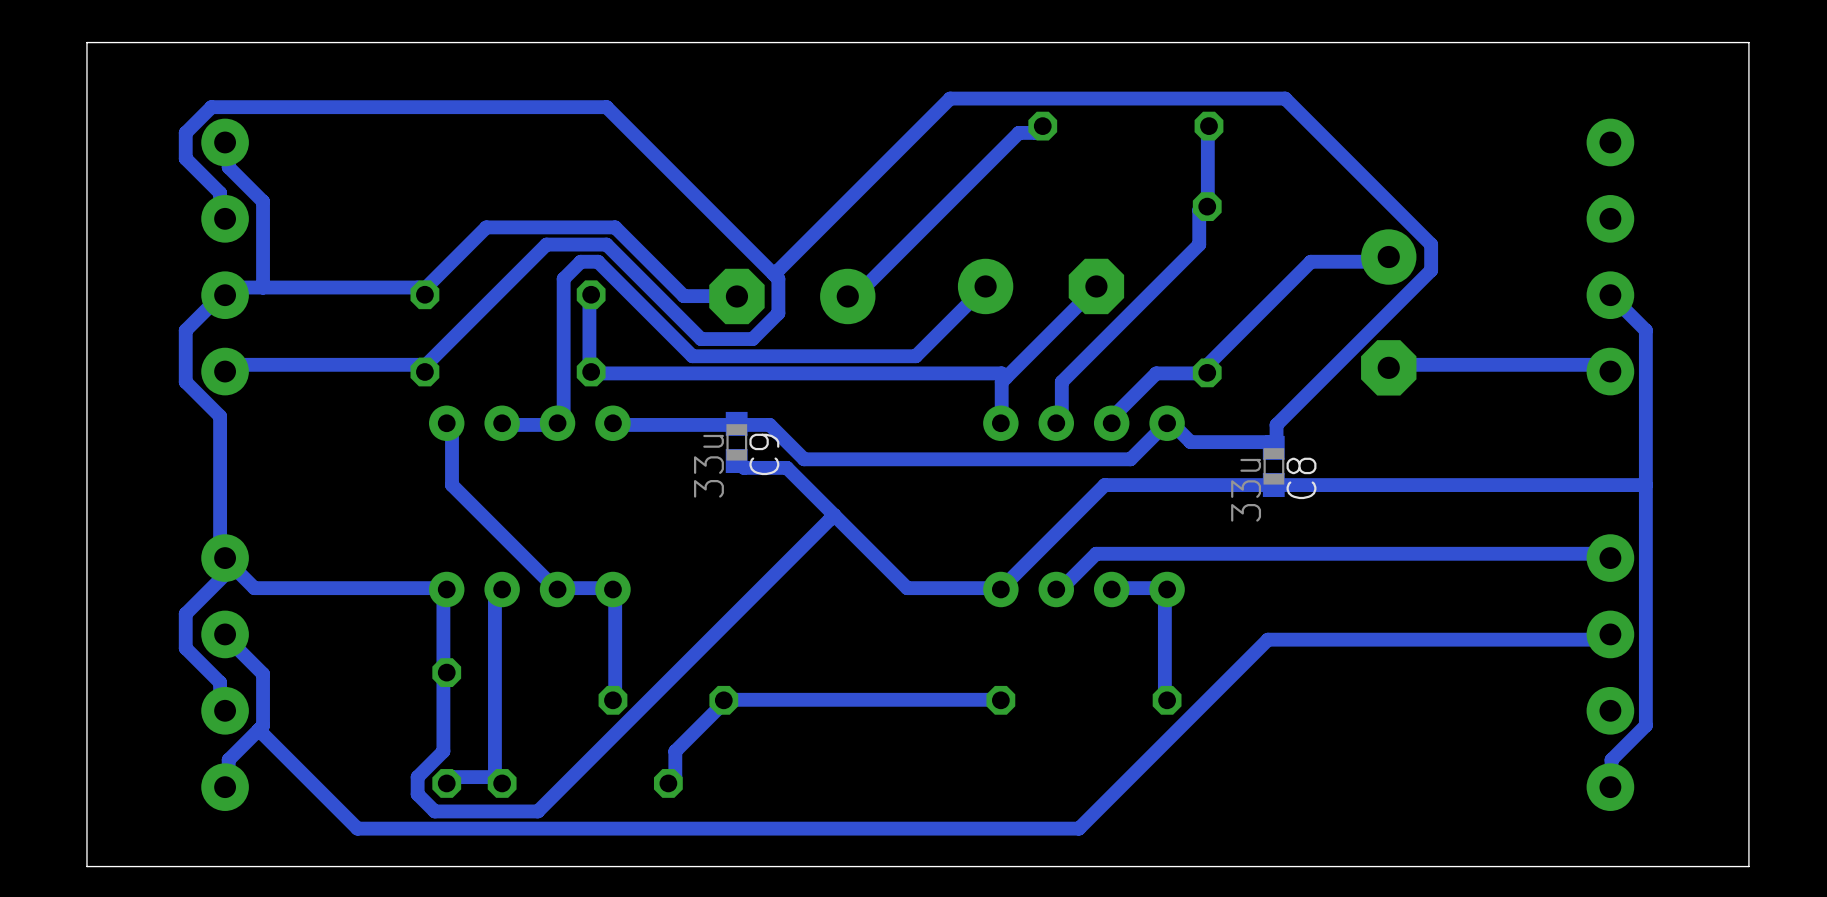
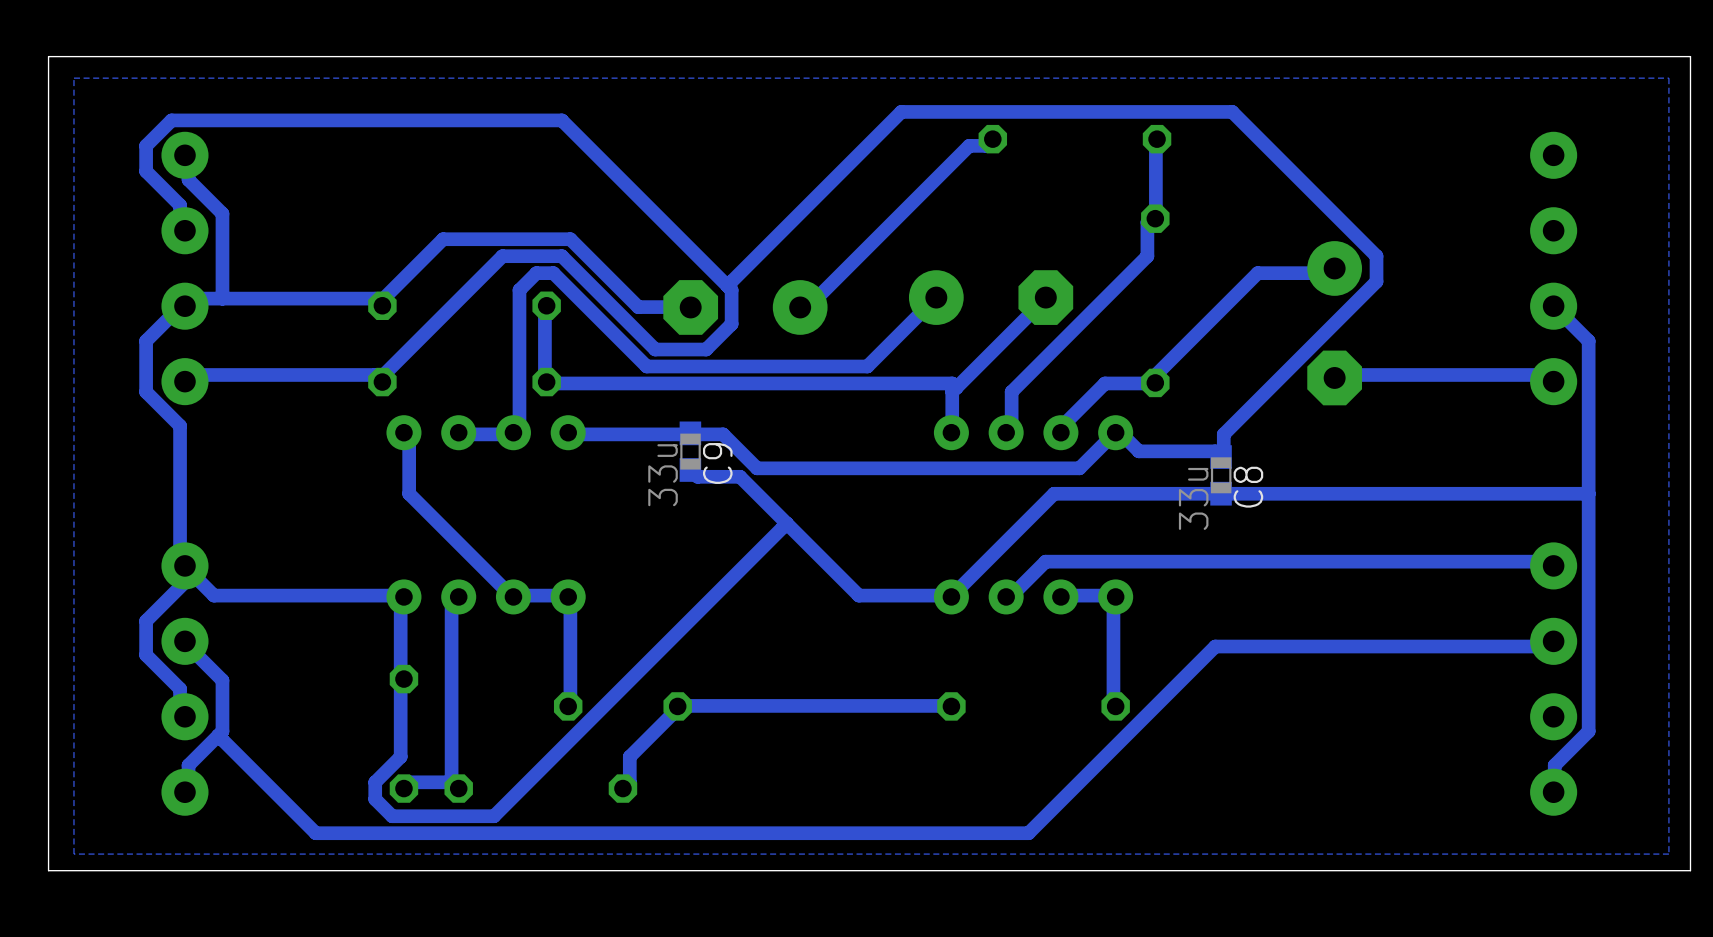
zone outline: none -> (1668, 78) (1668, 854) (73, 854) (73, 78) (1668, 78)

